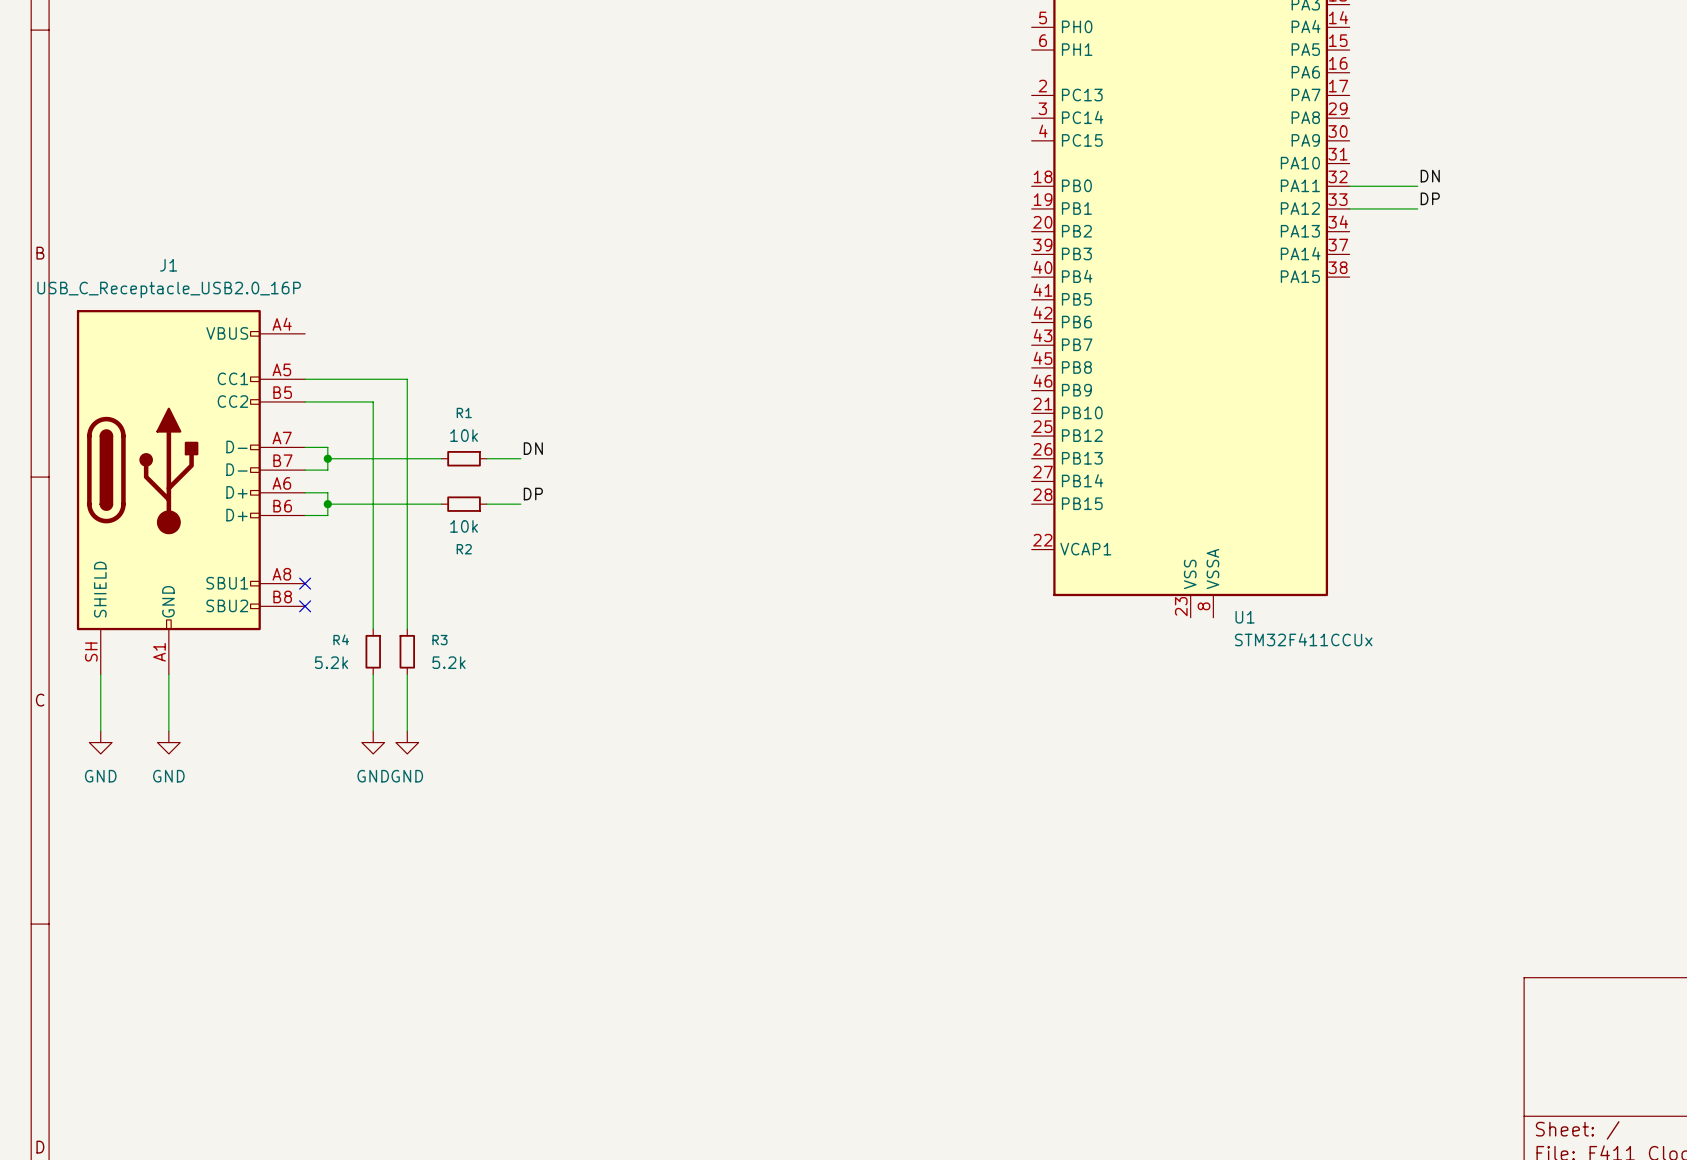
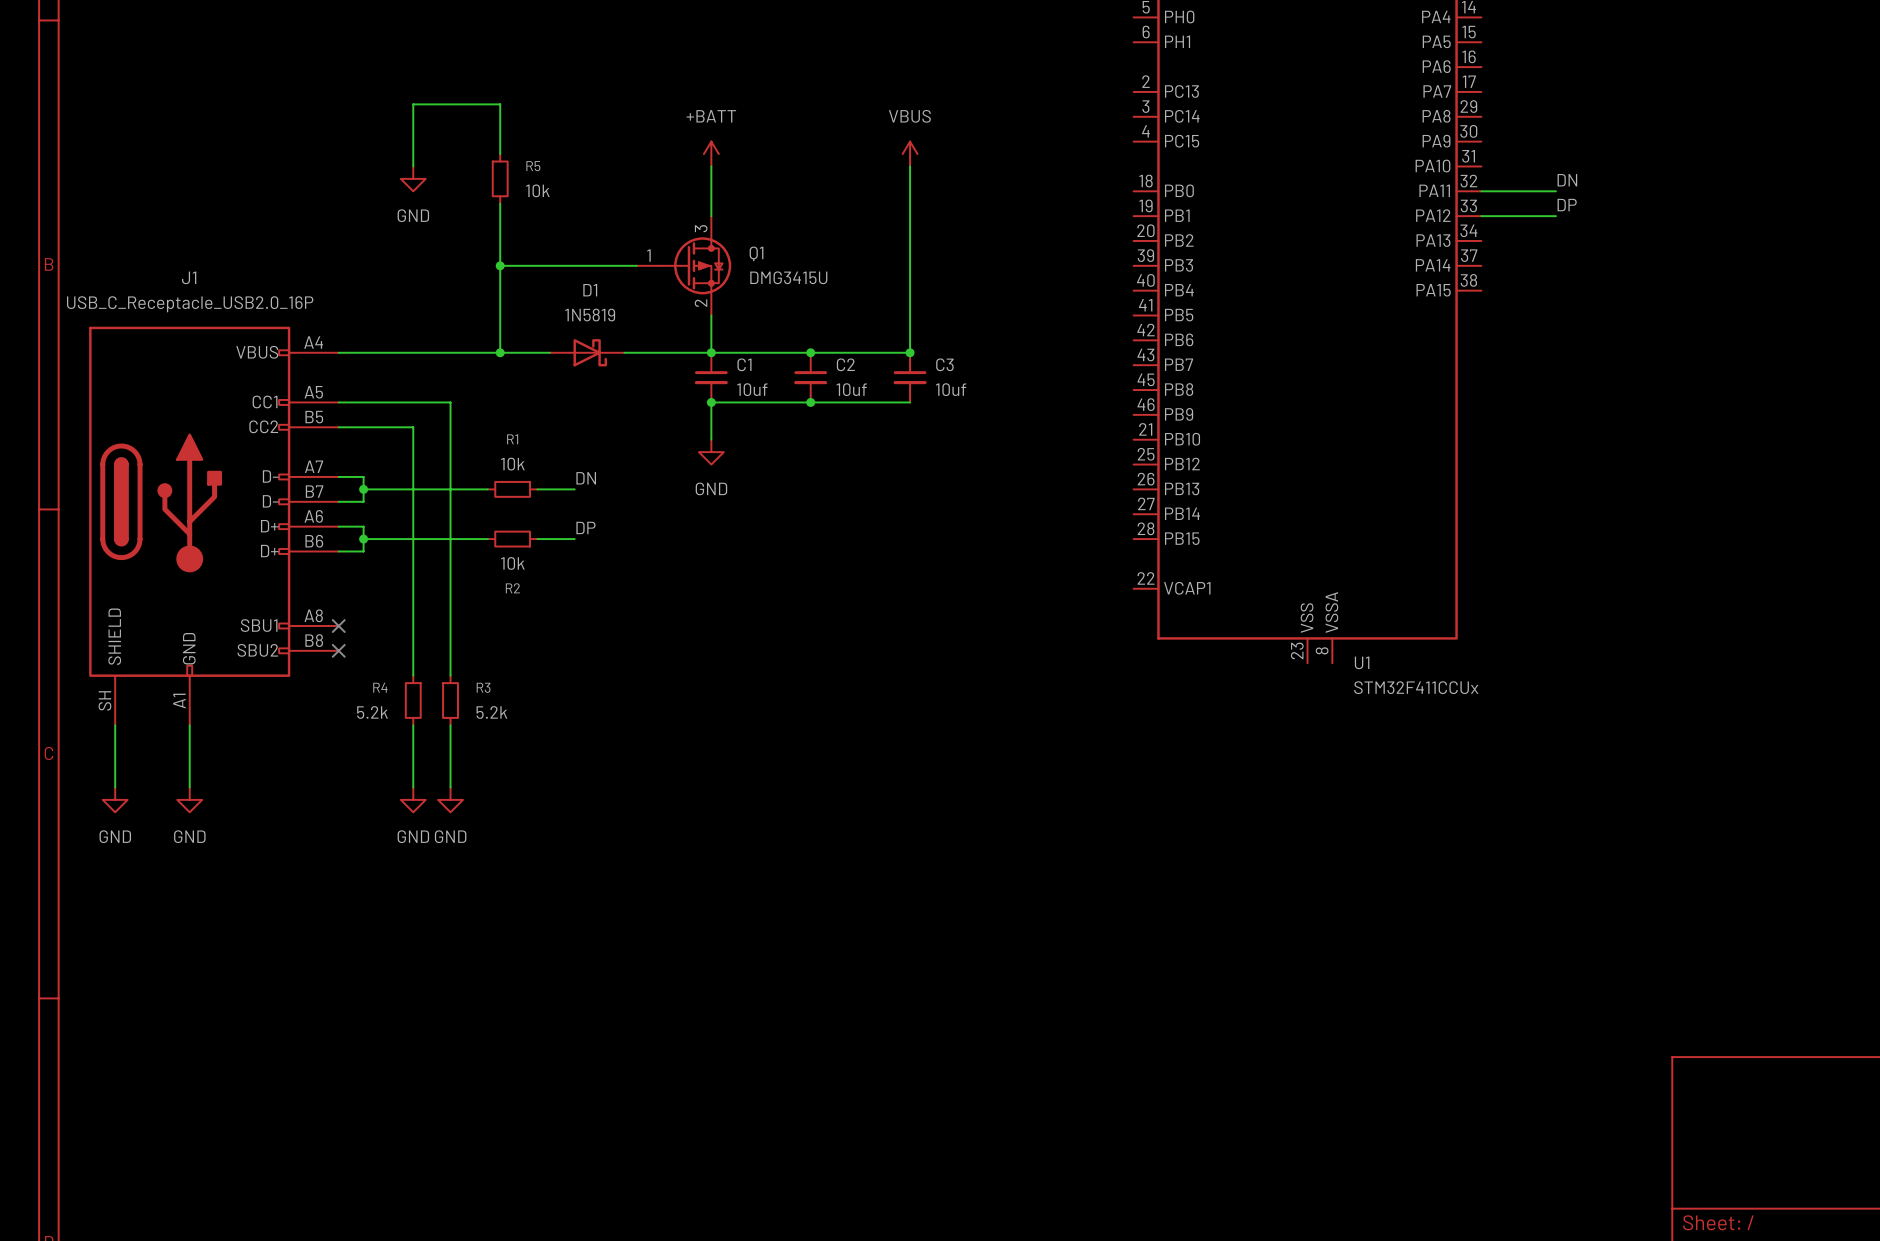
wire: none -> (500, 154) (500, 104) (413, 104) (413, 166)
power symbol: none -> +BATT (711, 154)
power symbol: none -> VBUS (910, 154)
wire: none -> (711, 166) (711, 216)
wire: none -> (910, 166) (910, 352) (624, 352)
power symbol: none -> GND (413, 178)
R5: none -> 10k (500, 178)
wire: none -> (500, 203) (500, 352)
wire: none -> (500, 265) (636, 265)
junction: none -> (500, 265)
Q1: none -> DMG3415U (684, 265)
wire: none -> (711, 315) (711, 352)
wire: none -> (338, 352) (549, 352)
junction: none -> (500, 352)
D1: none -> 1N5819 (587, 352)
junction: none -> (711, 352)
junction: none -> (810, 352)
junction: none -> (910, 352)
C1: none -> 10uf (711, 377)
C2: none -> 10uf (810, 377)
C3: none -> 10uf (910, 377)
junction: none -> (711, 402)
junction: none -> (810, 402)
wire: none -> (910, 402) (711, 402) (711, 439)
power symbol: none -> GND (711, 452)

